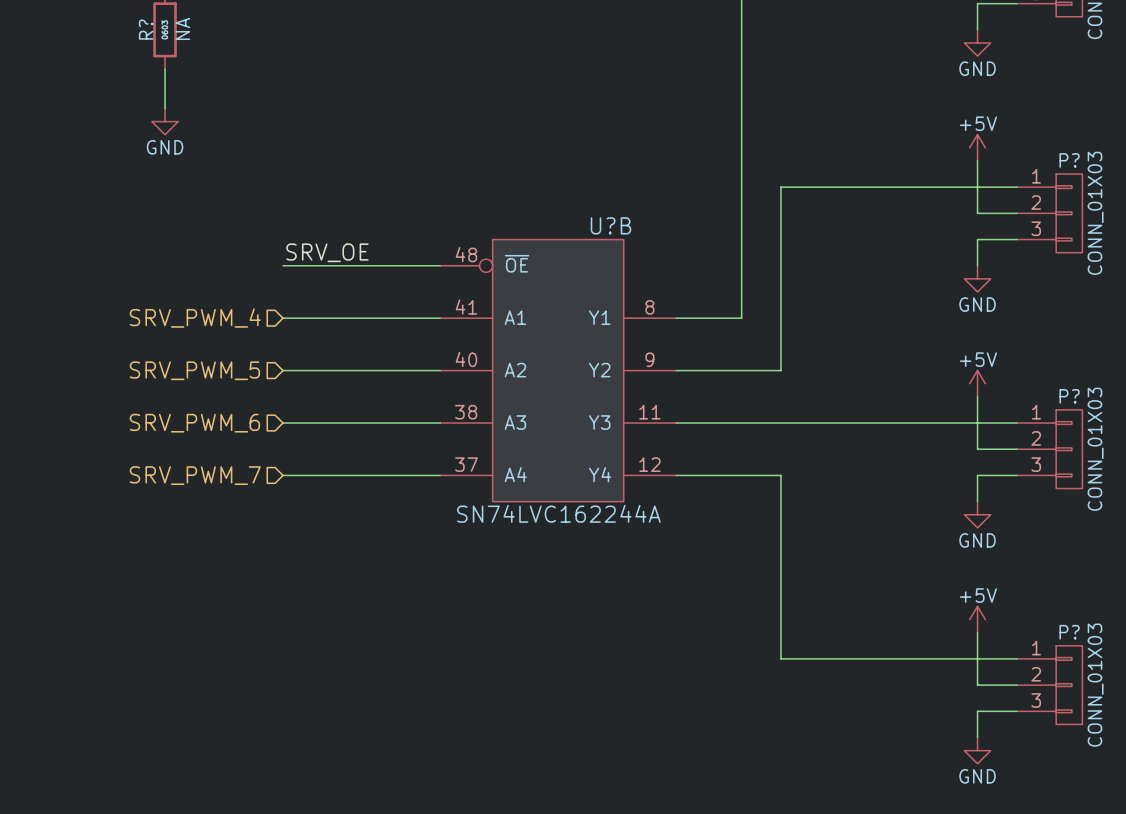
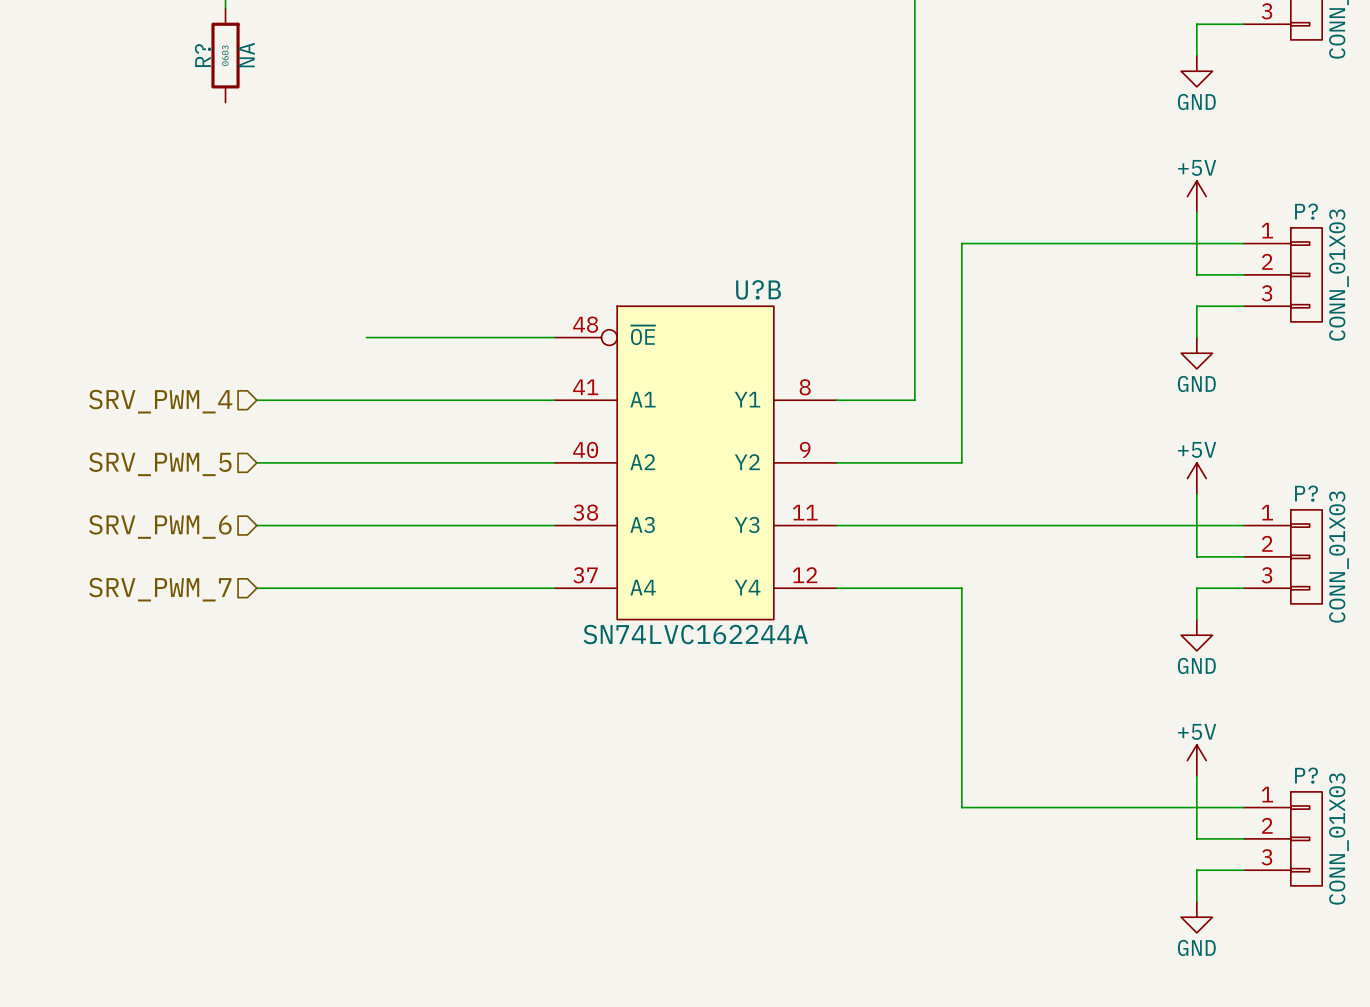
wire: (165, 69) (165, 108) -> none
power symbol: GND (165, 121) -> none
label: SRV_OE (327, 252) -> none
hierarchical label position: SRV_PWM_4 (195, 317) -> SRV_PWM_4 (160, 401)
wire: none -> (256, 400) (366, 400)
wire: none -> (256, 462) (366, 462)
hierarchical label position: SRV_PWM_5 (194, 370) -> SRV_PWM_5 (160, 464)
wire: none -> (256, 525) (366, 525)
hierarchical label position: SRV_PWM_6 (194, 423) -> SRV_PWM_6 (160, 526)
wire: none -> (256, 588) (366, 588)
hierarchical label position: SRV_PWM_7 (195, 475) -> SRV_PWM_7 (160, 589)

